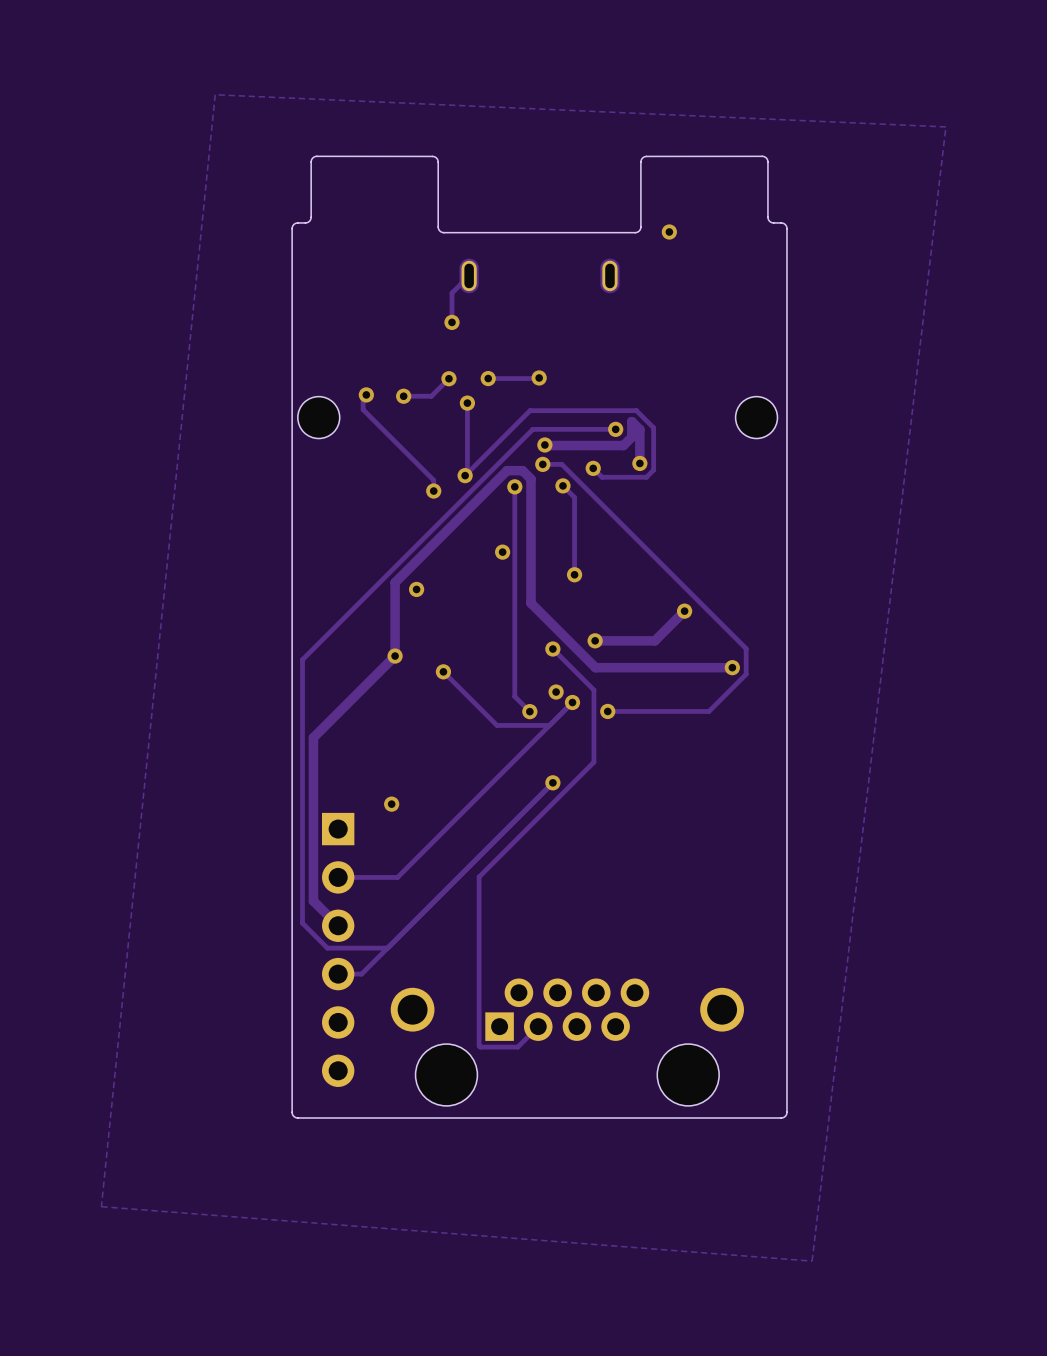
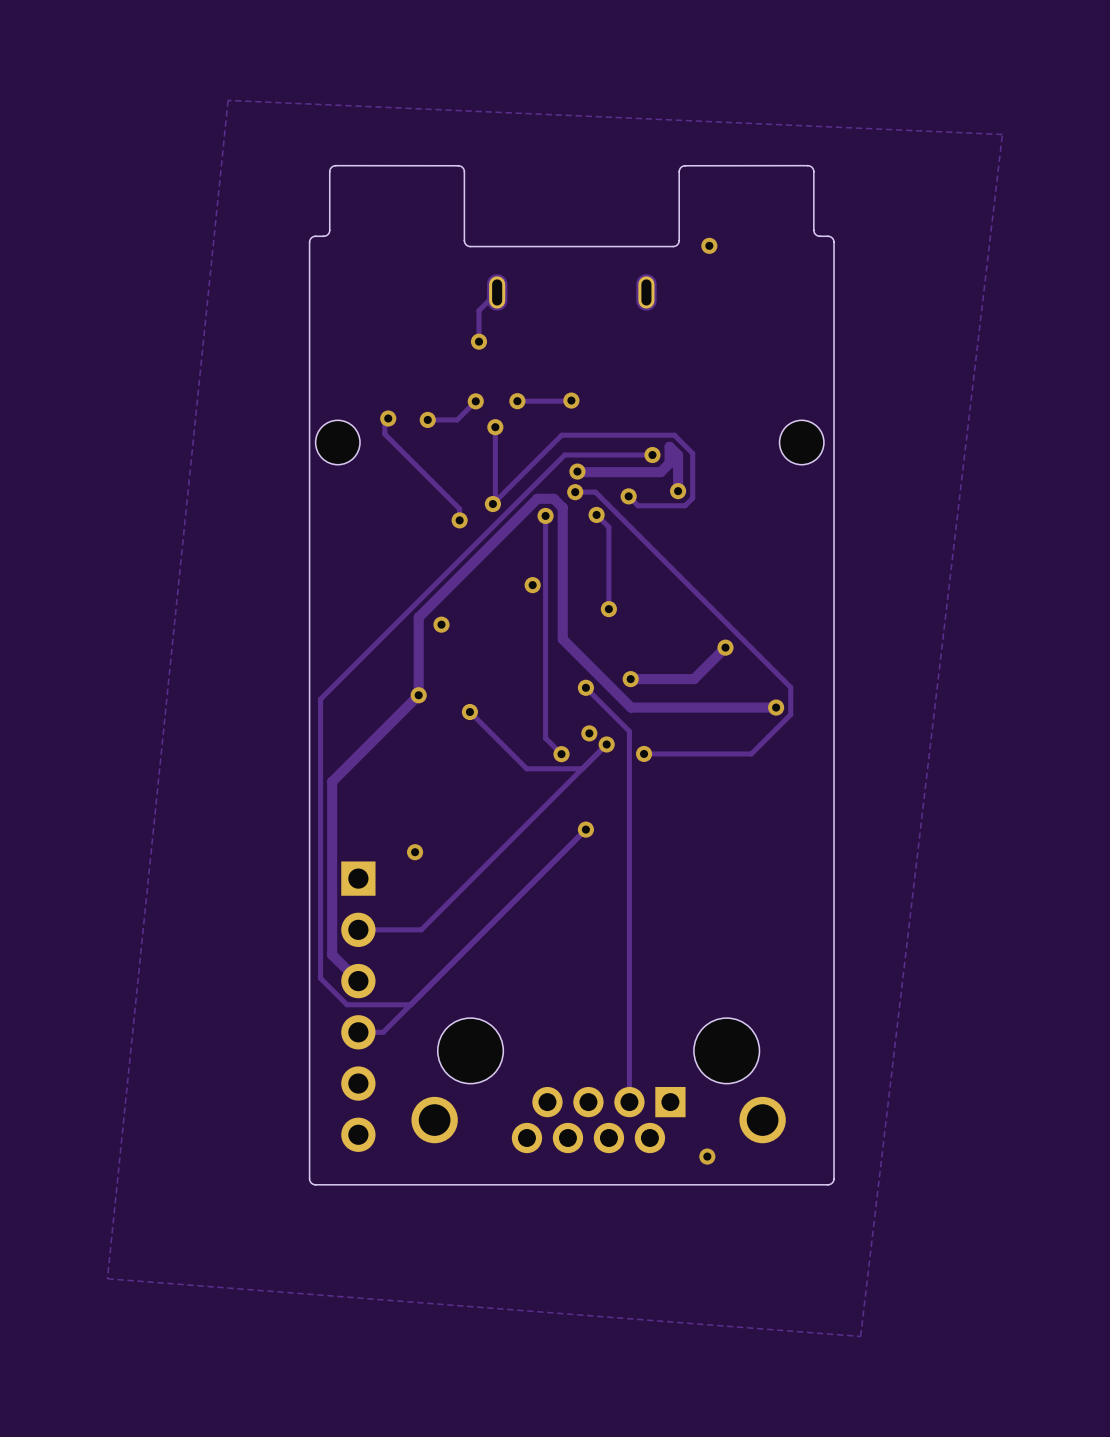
track: (593, 762) (479, 877) (479, 1045) (517, 1047) (538, 1026) -> (629, 807) (629, 1102)
part rotation: 0° (567, 1042) -> 180° (598, 1085)
via: none -> (707, 1156)

